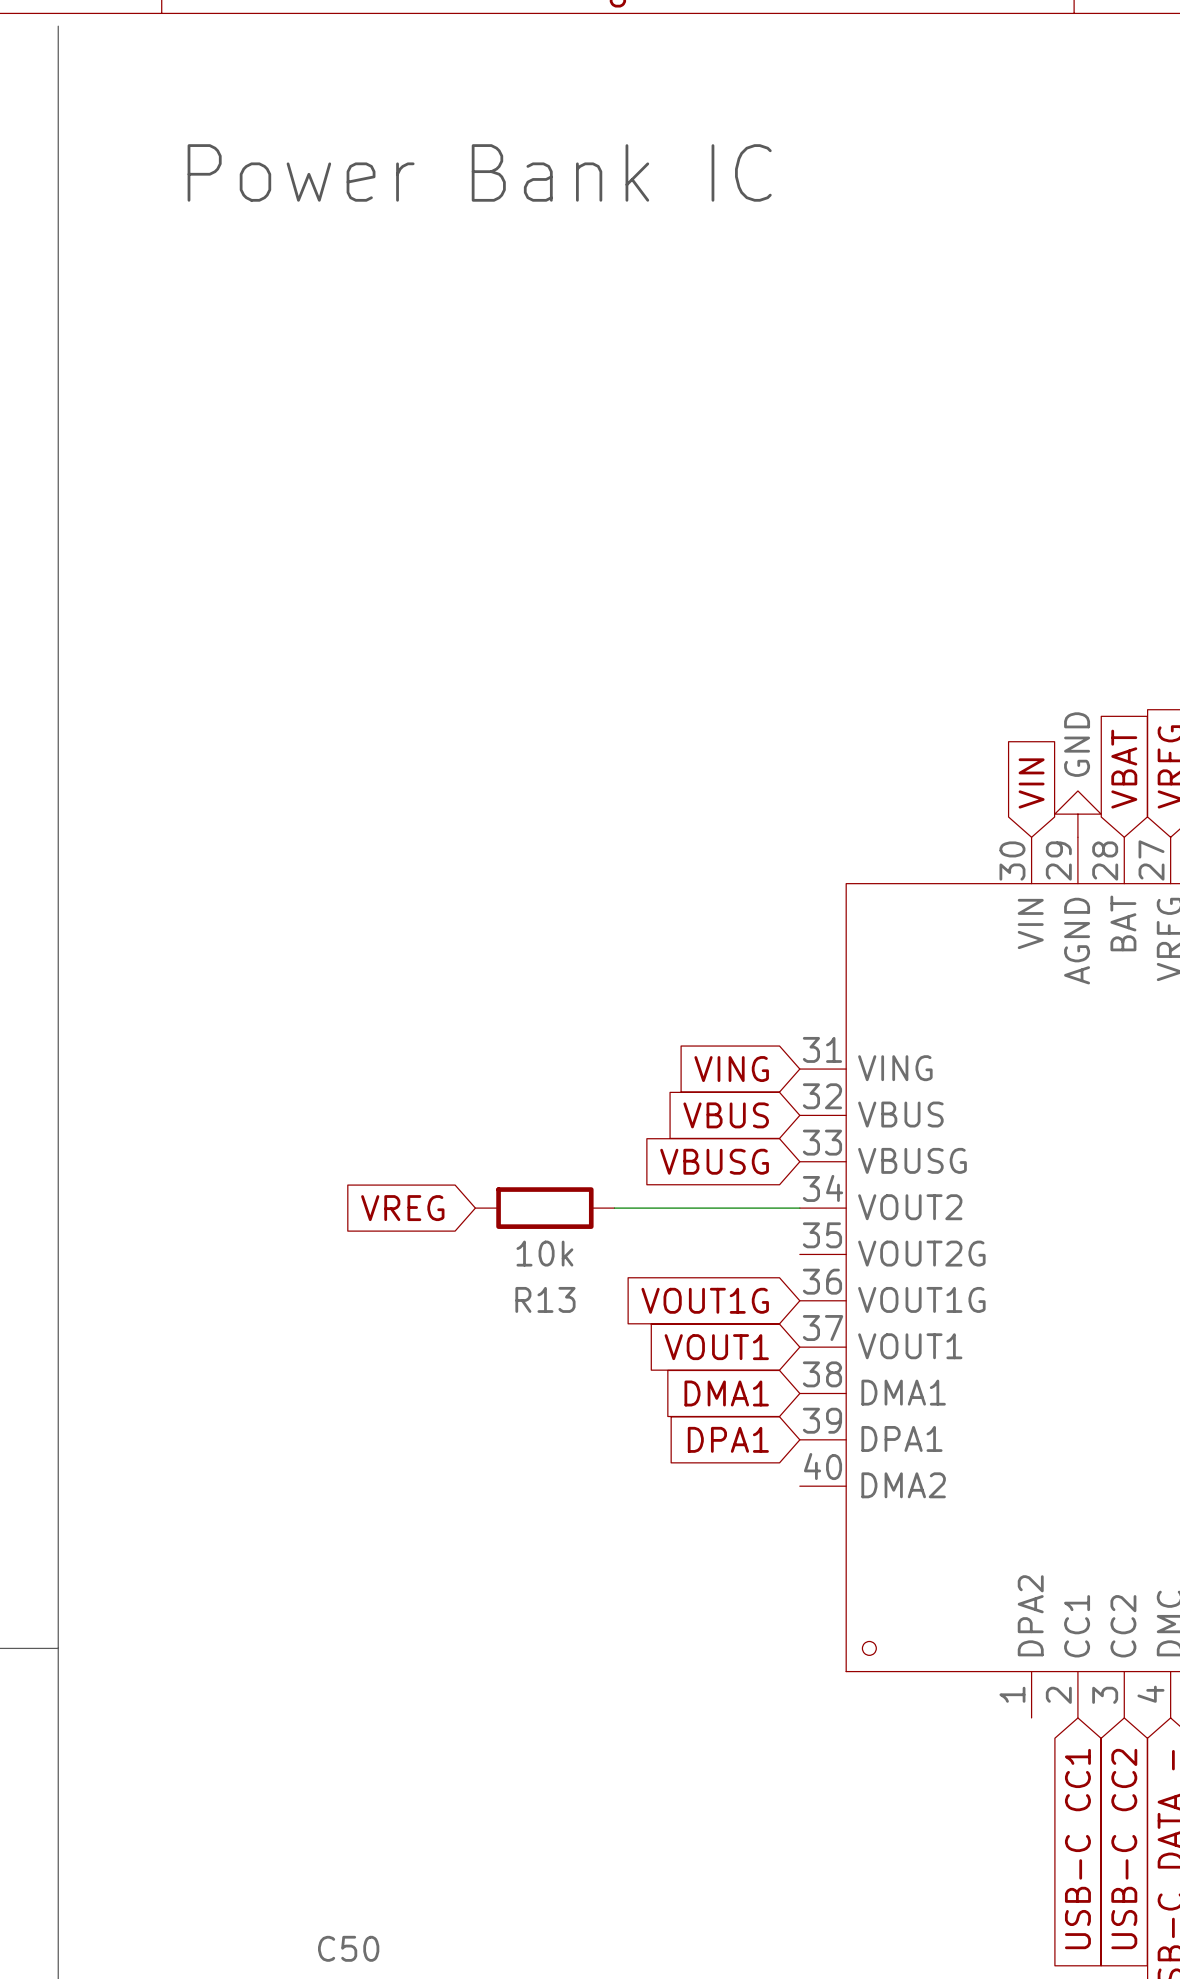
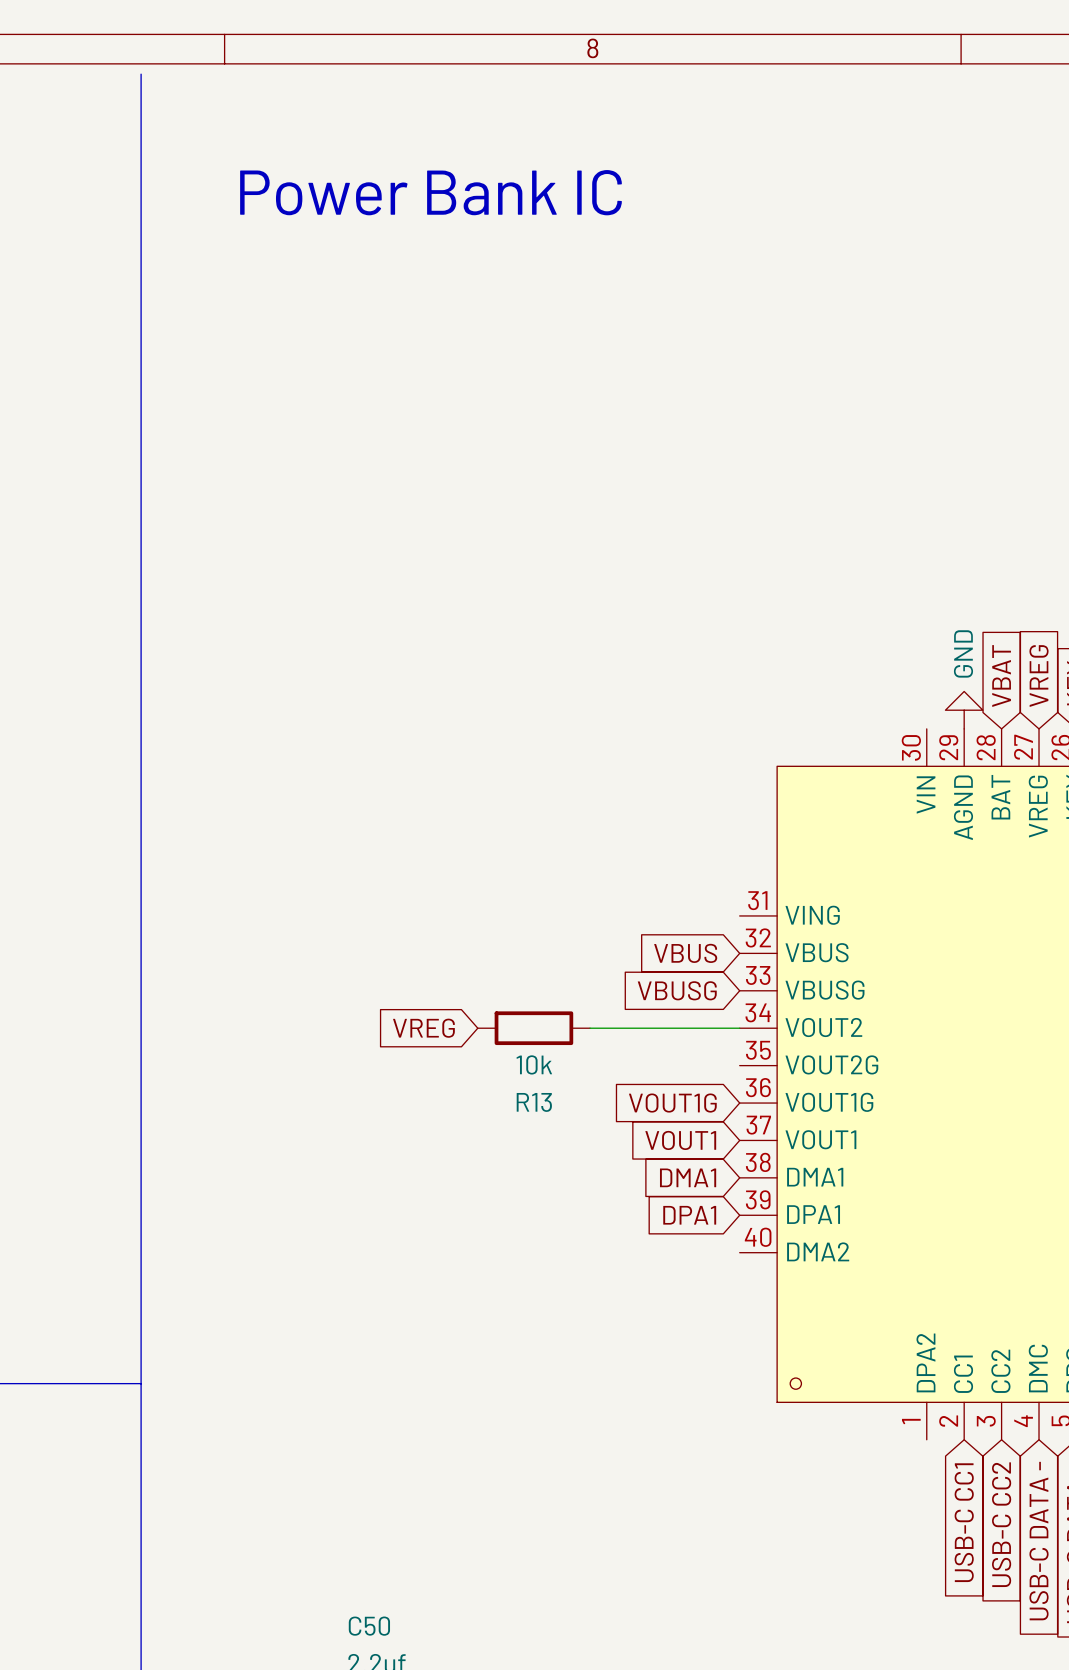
global label: VIN (1031, 783) -> none
global label: VING (731, 1069) -> none

